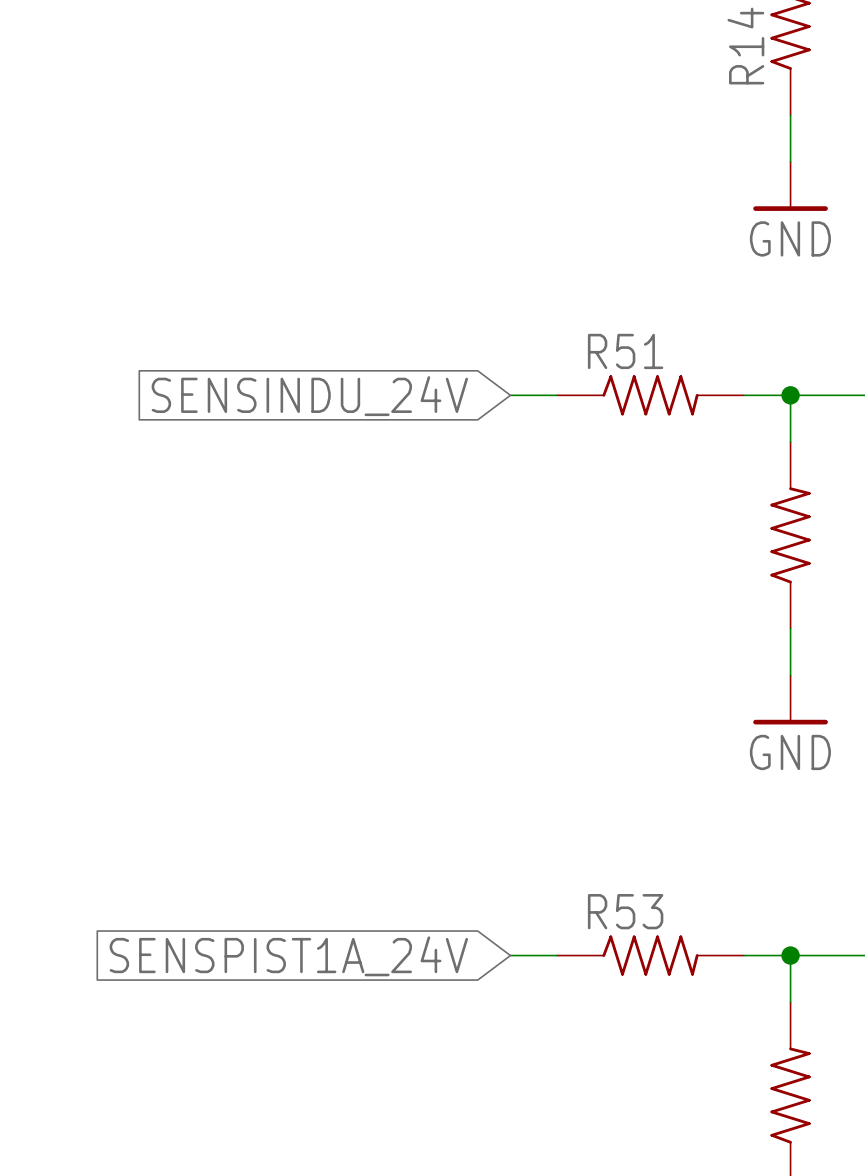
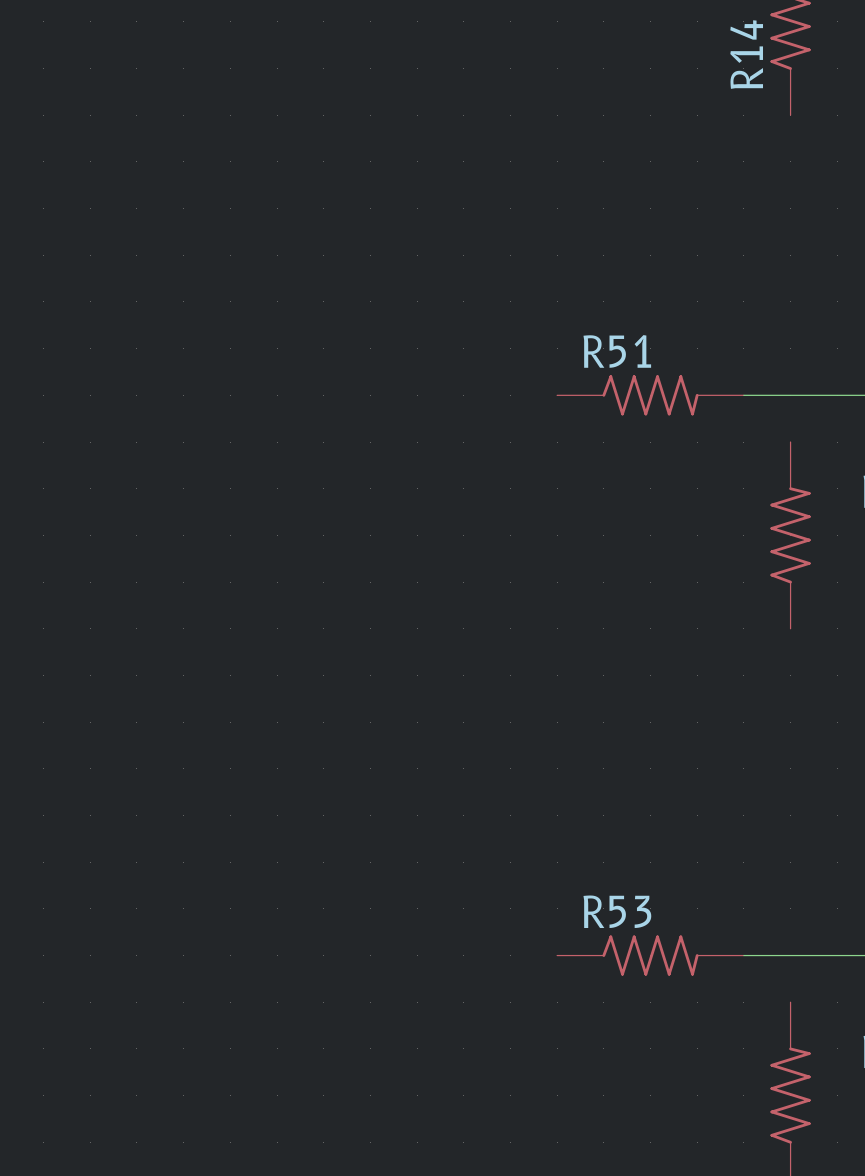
wire: (790, 115) (790, 161) -> none
power symbol: GND (790, 186) -> none
wire: (510, 395) (557, 395) -> none
wire: (790, 395) (790, 442) -> none
junction: (790, 395) -> none
global label: SENSINDU_24V (309, 396) -> none
wire: (790, 628) (790, 675) -> none
power symbol: GND (790, 699) -> none
wire: (510, 955) (557, 955) -> none
wire: (790, 955) (790, 1002) -> none
junction: (790, 955) -> none
global label: SENSPIST1A_24V (288, 956) -> none

